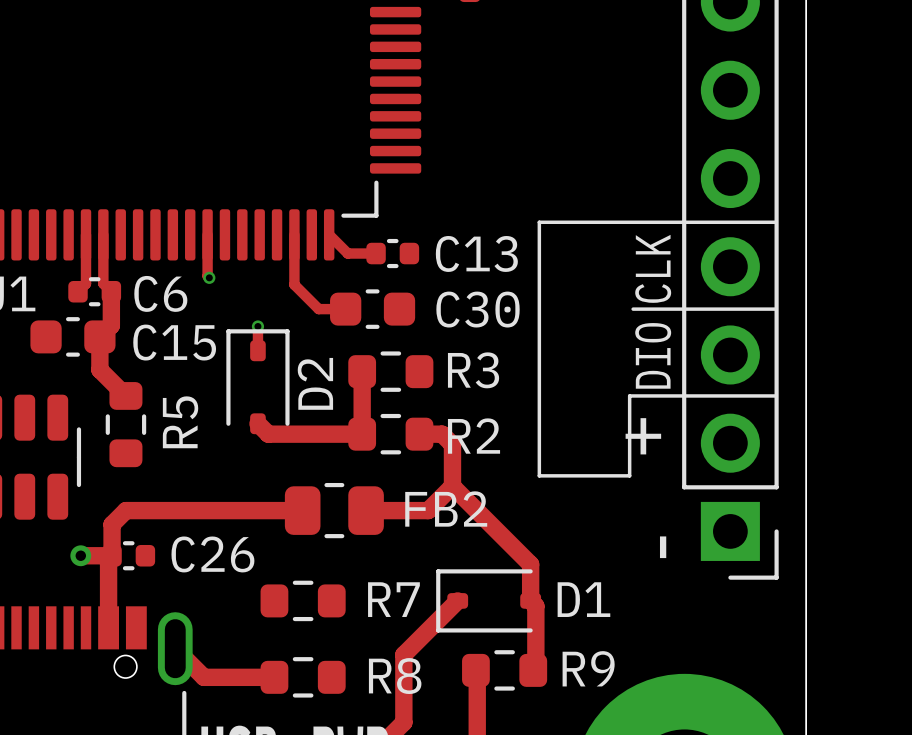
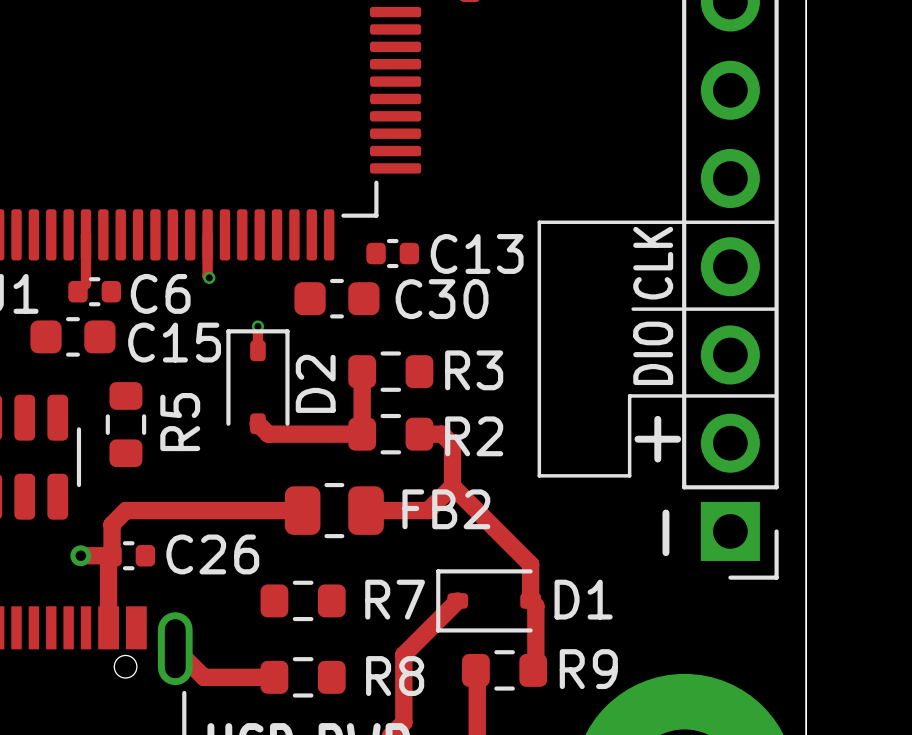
track: (103, 234) (103, 283) (111, 291) (111, 325) (99, 336) (99, 369) (125, 395) -> none
track: (294, 234) (294, 284) (318, 309) (345, 309) -> none
track: (329, 234) (347, 253) (376, 253) -> none
C30 position: (372, 309) -> (336, 298)

